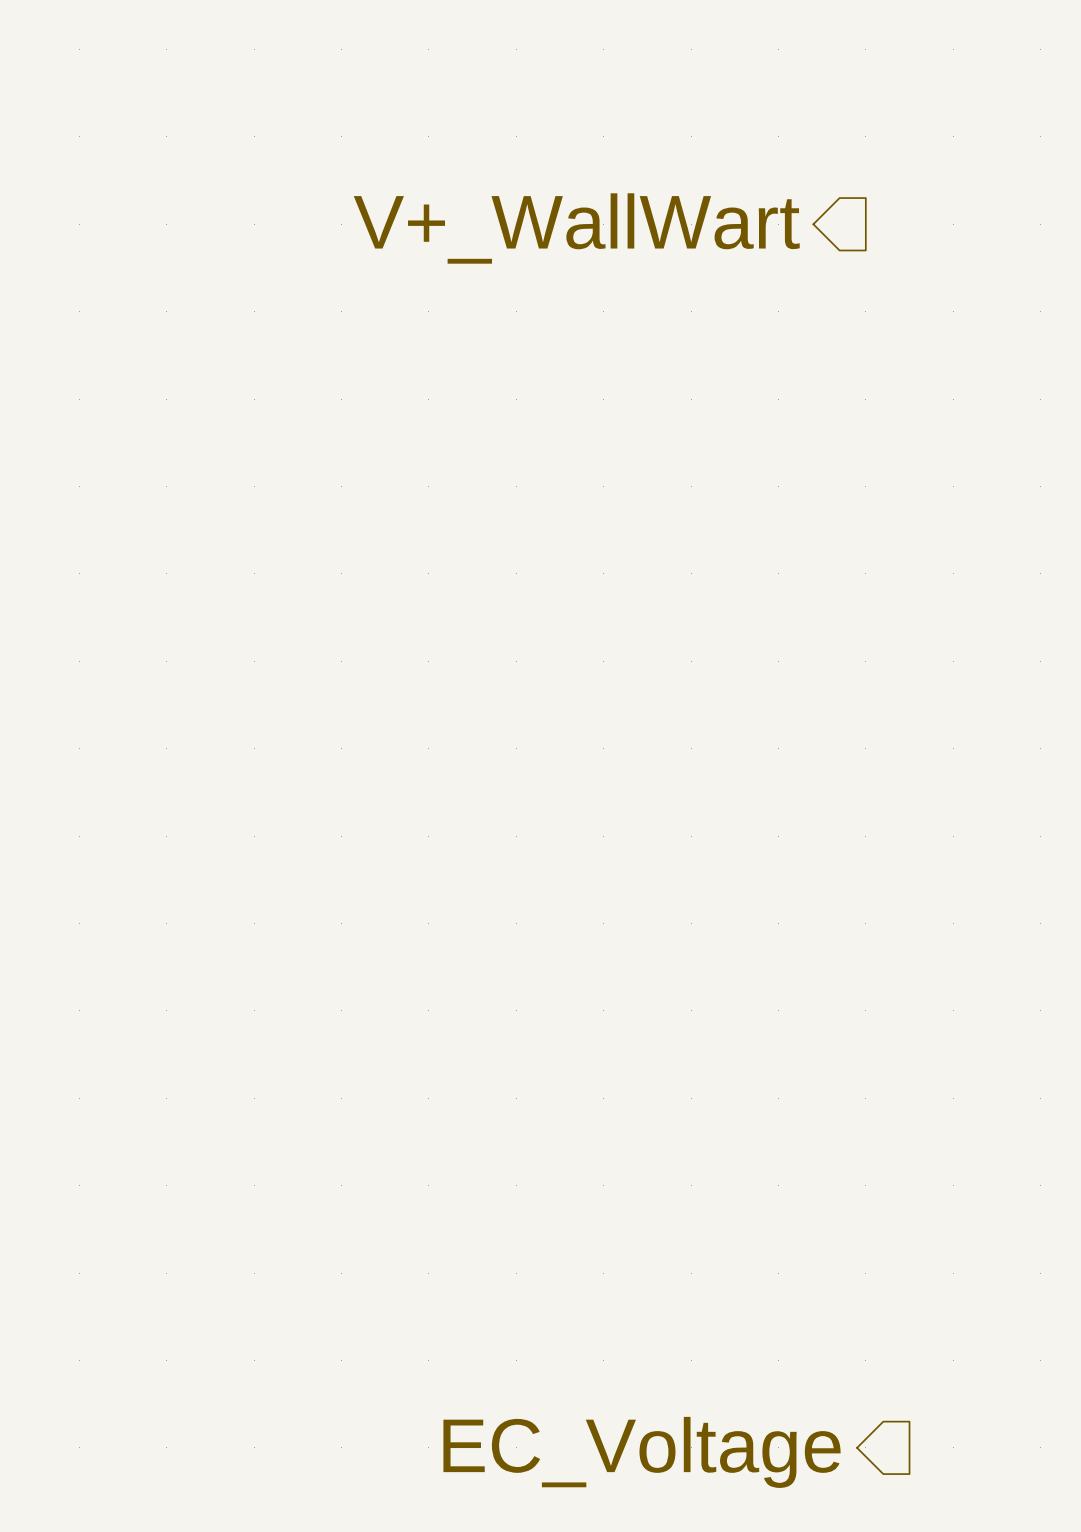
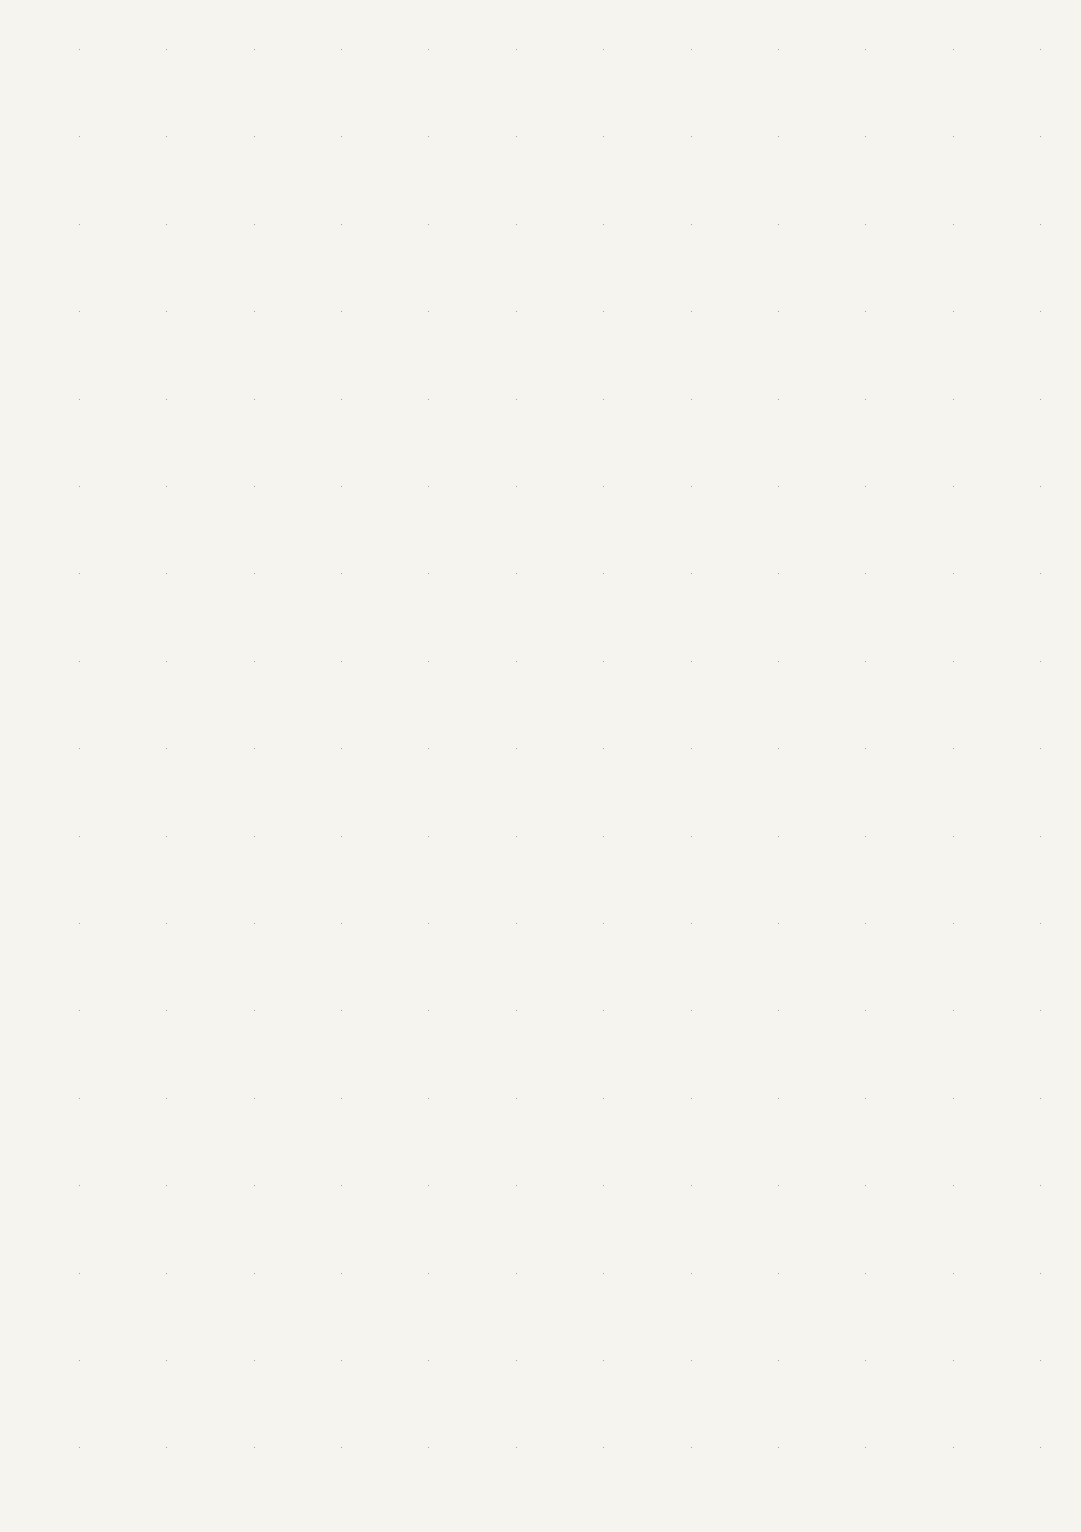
hierarchical label: V+_WallWart (576, 228) -> none
hierarchical label: EC_Voltage (642, 1452) -> none

